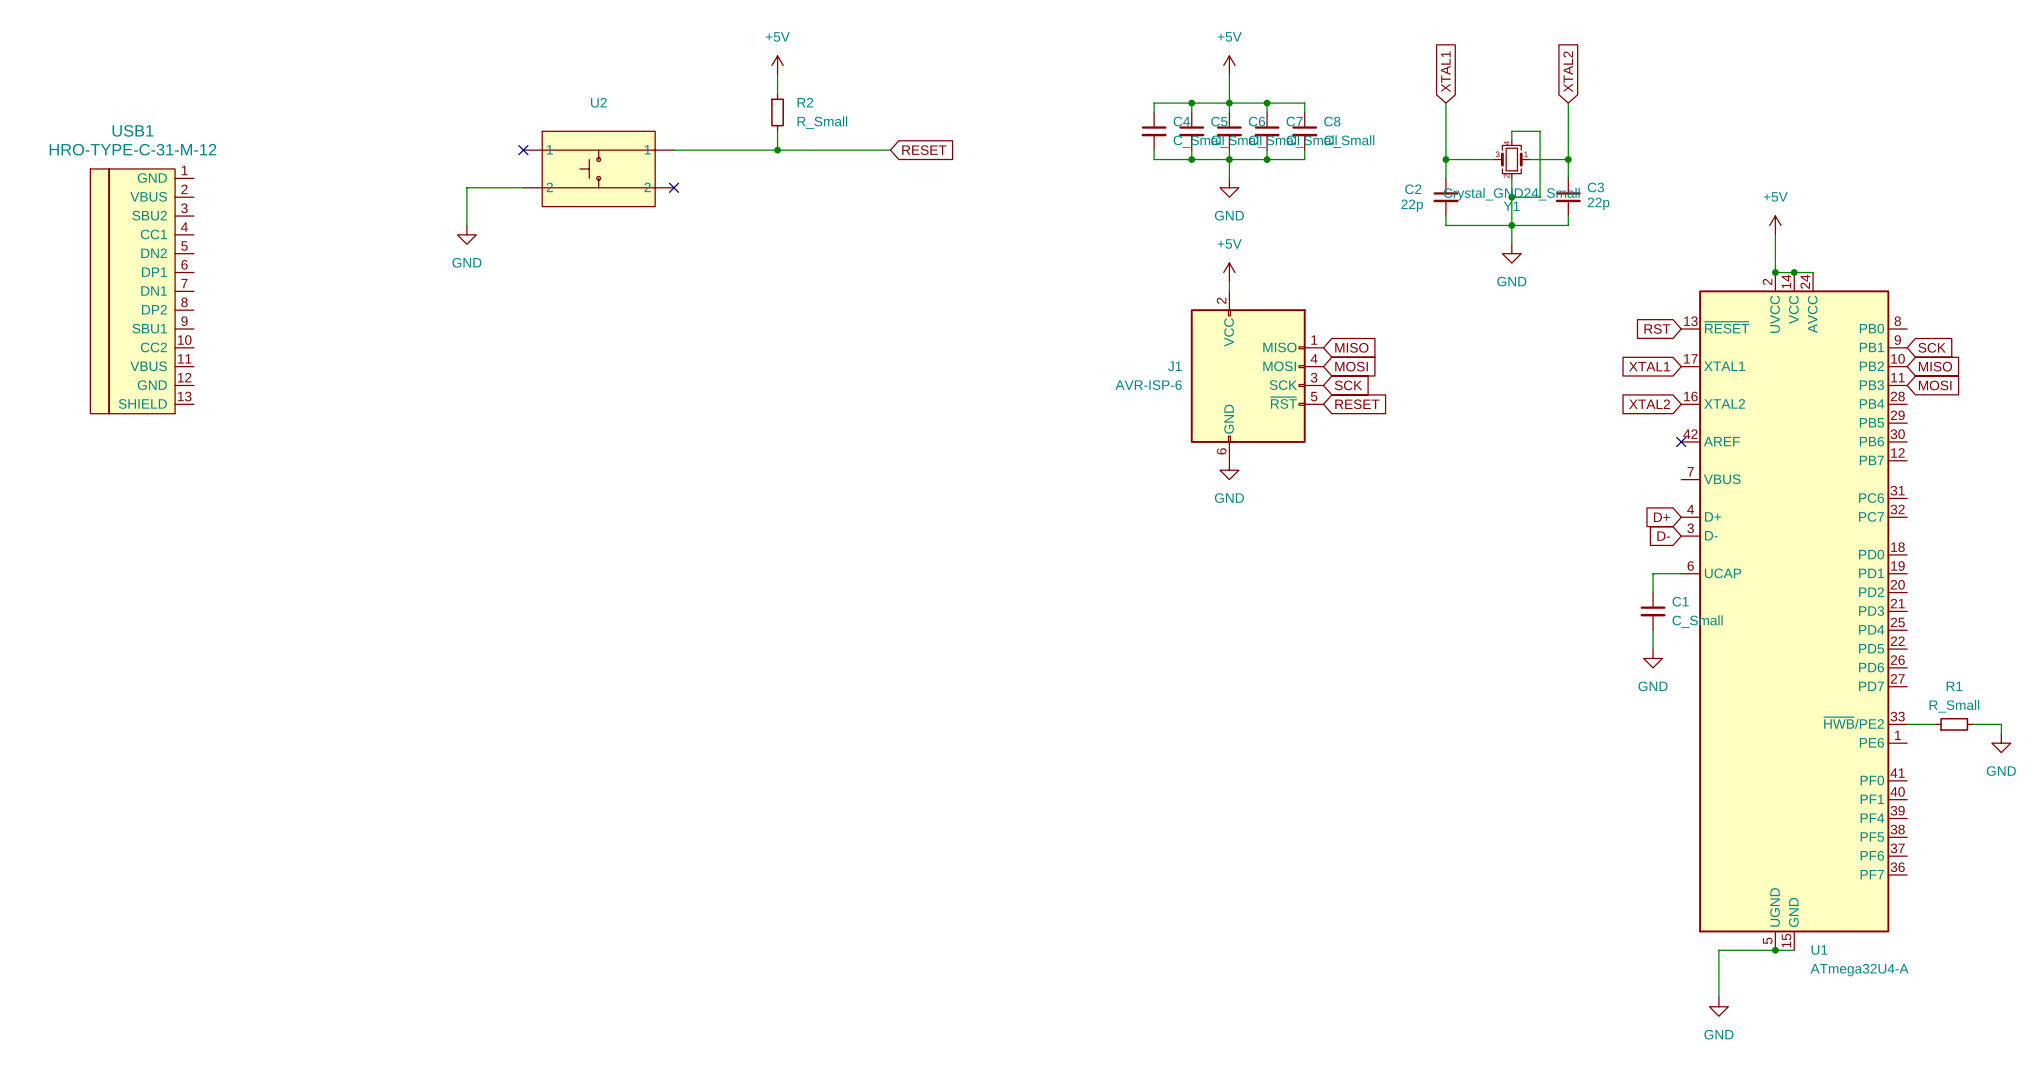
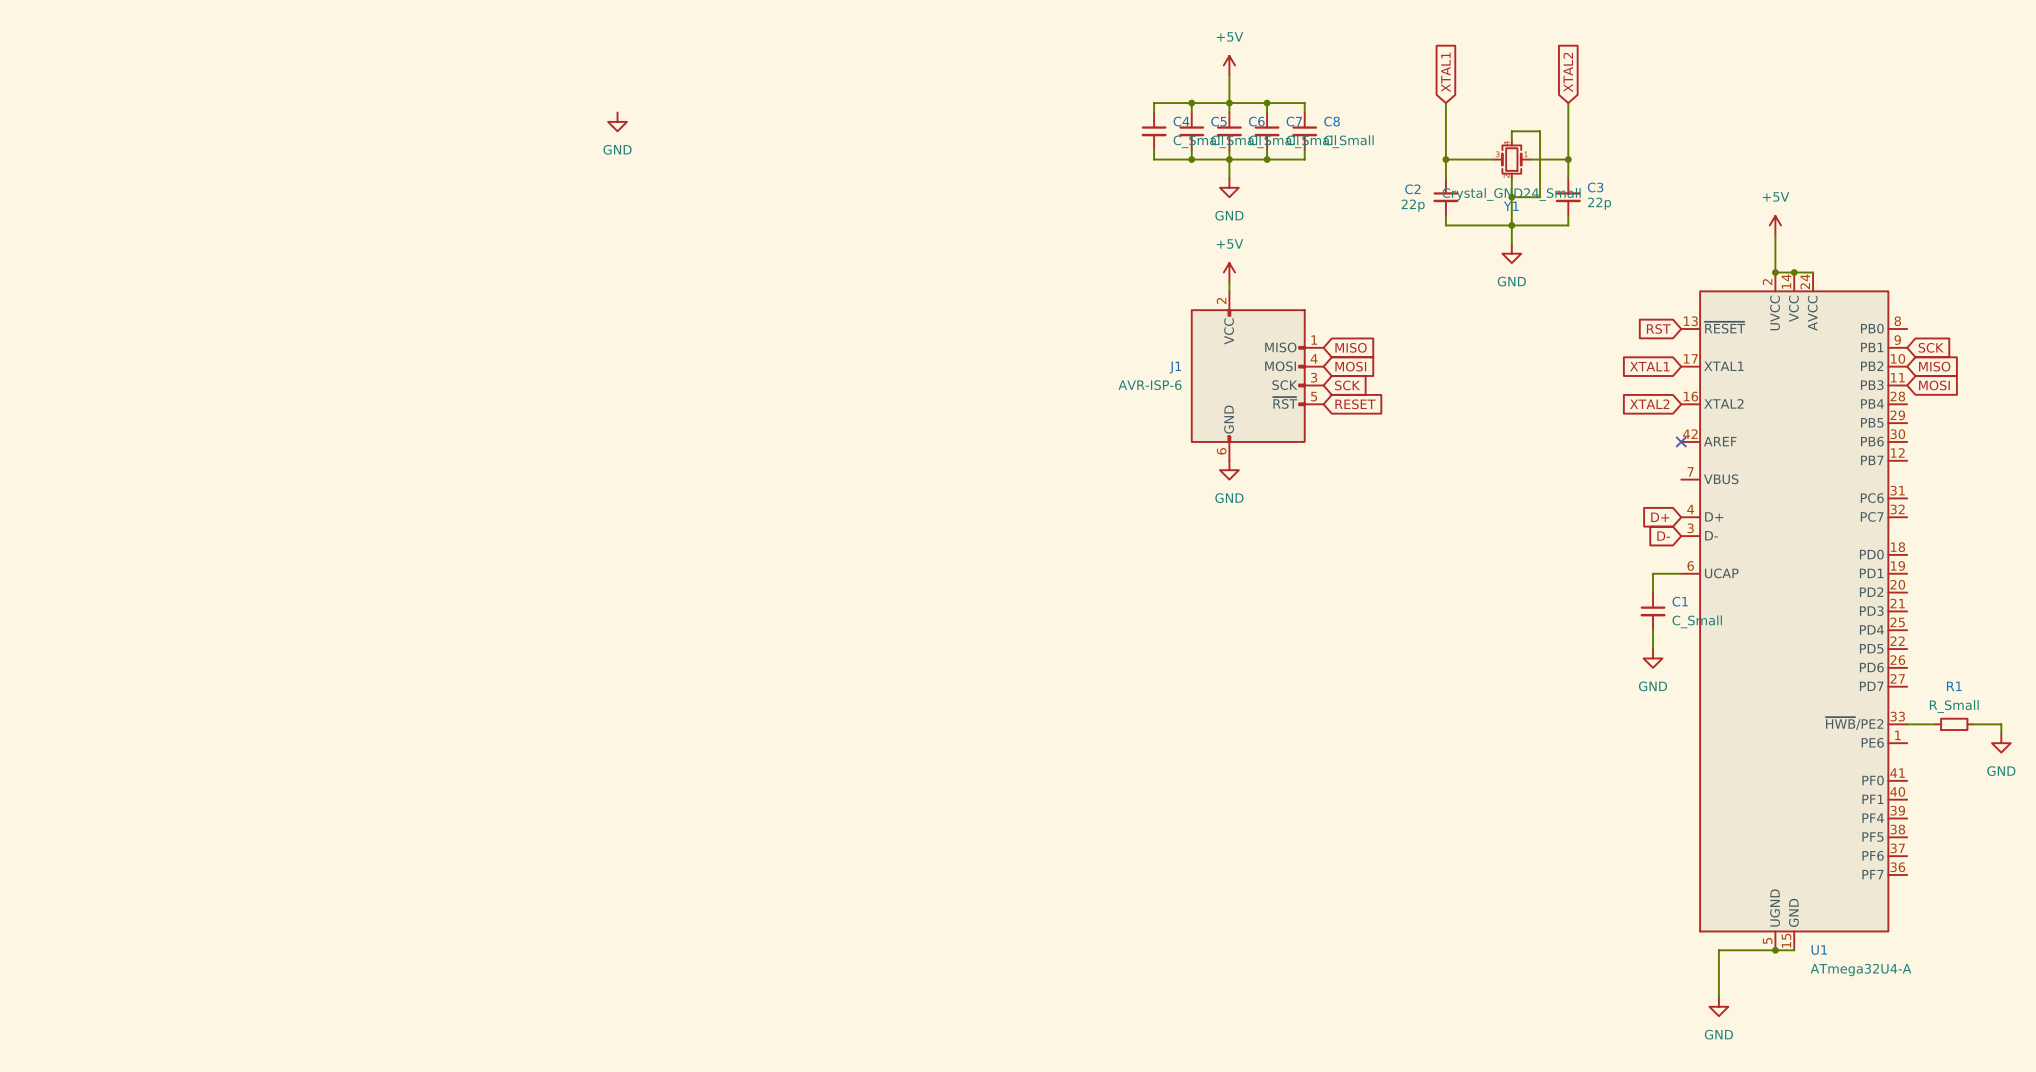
power symbol: +5V (777, 65) -> none
wire: (777, 74) (777, 93) -> none
R2: R_Small (777, 112) -> none
power symbol: none -> GND (617, 121)
wire: (777, 131) (777, 150) -> none
no-connect mark: (523, 150) -> none
wire: (674, 150) (890, 150) -> none
junction: (777, 150) -> none
global label: RESET (924, 150) -> none
U2: (598, 168) -> none
wire: (523, 187) (466, 187) (466, 225) -> none
no-connect mark: (674, 187) -> none
power symbol: GND (466, 234) -> none
USB1: HRO-TYPE-C-31-M-12 (142, 291) -> none

